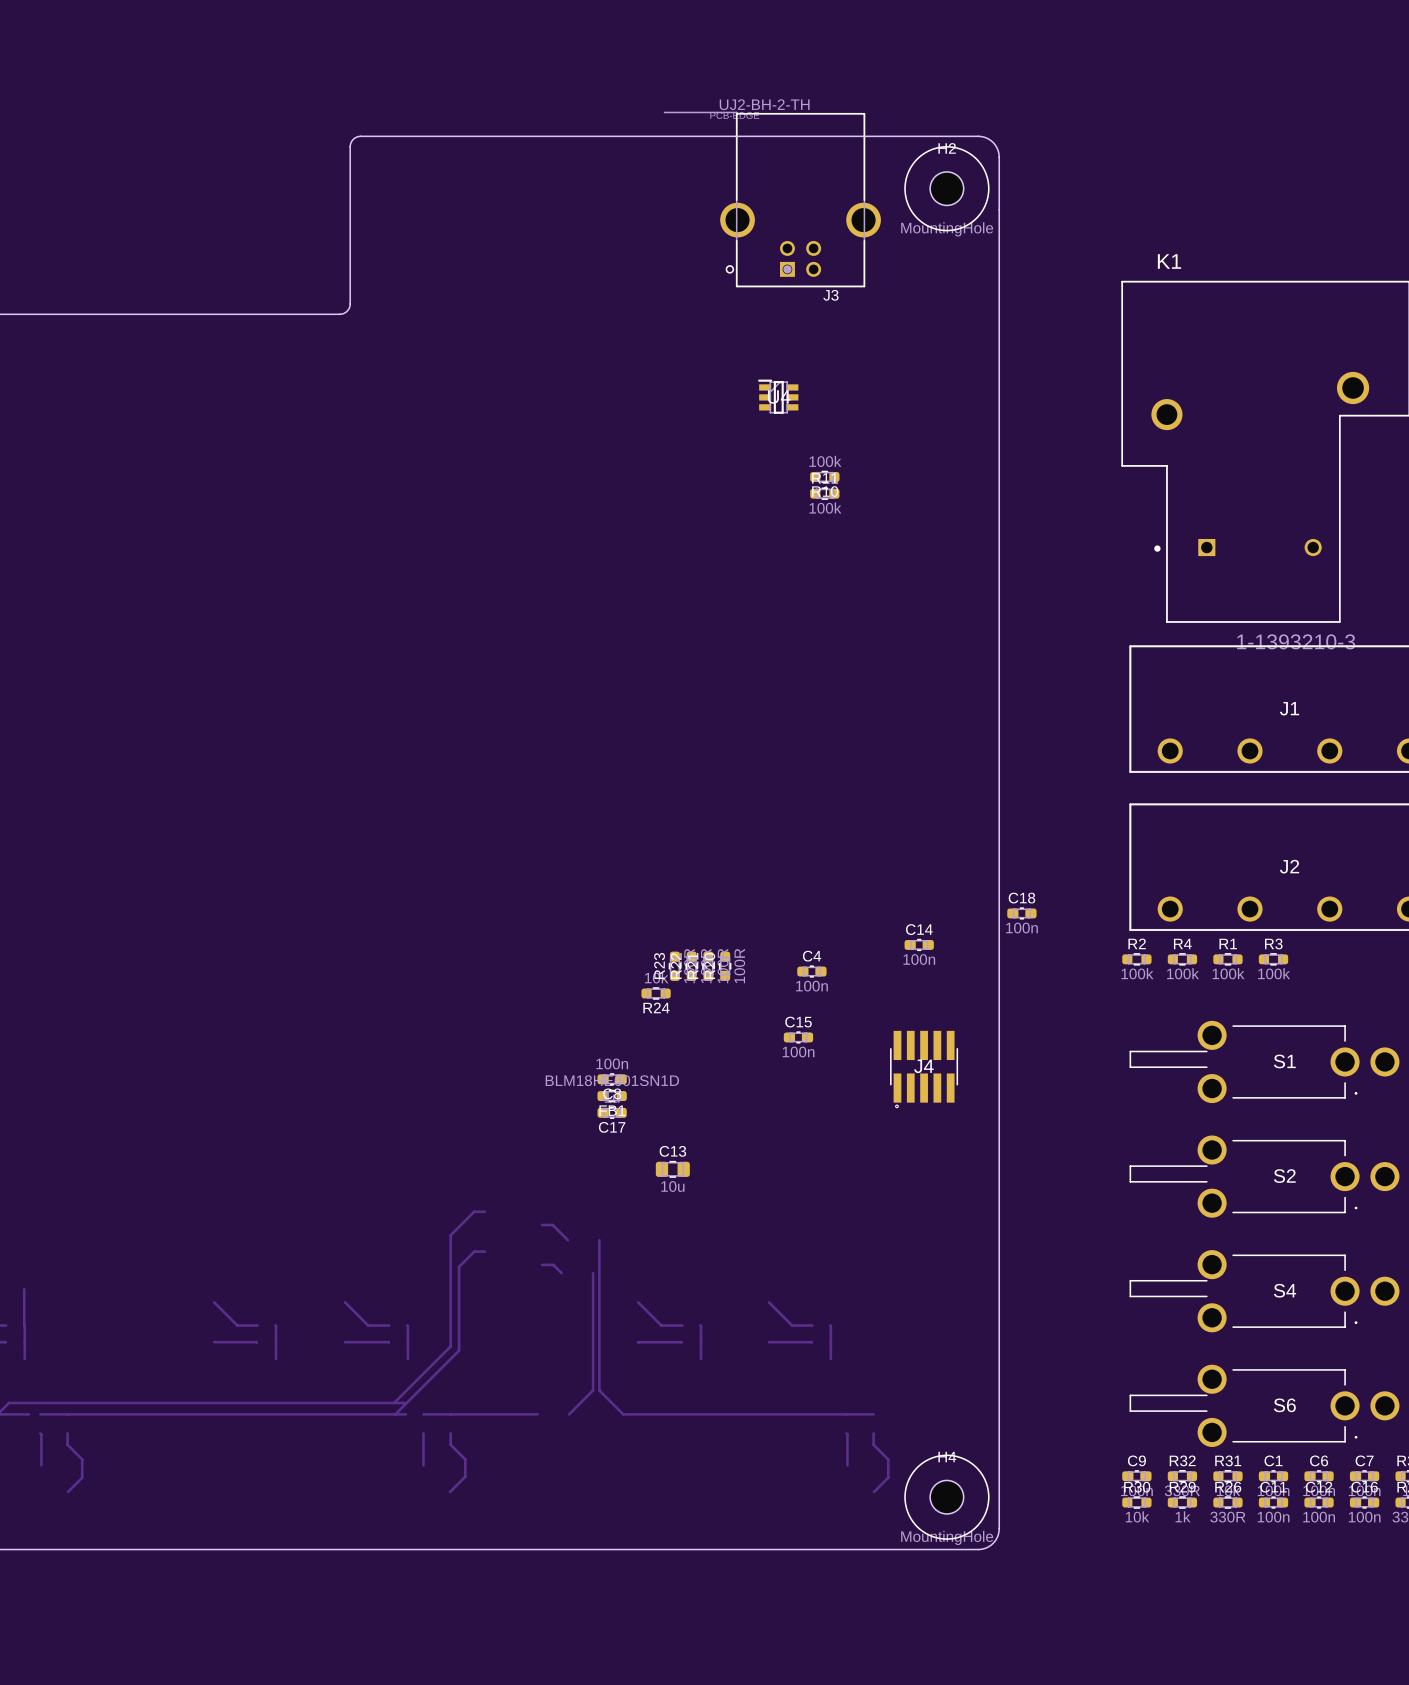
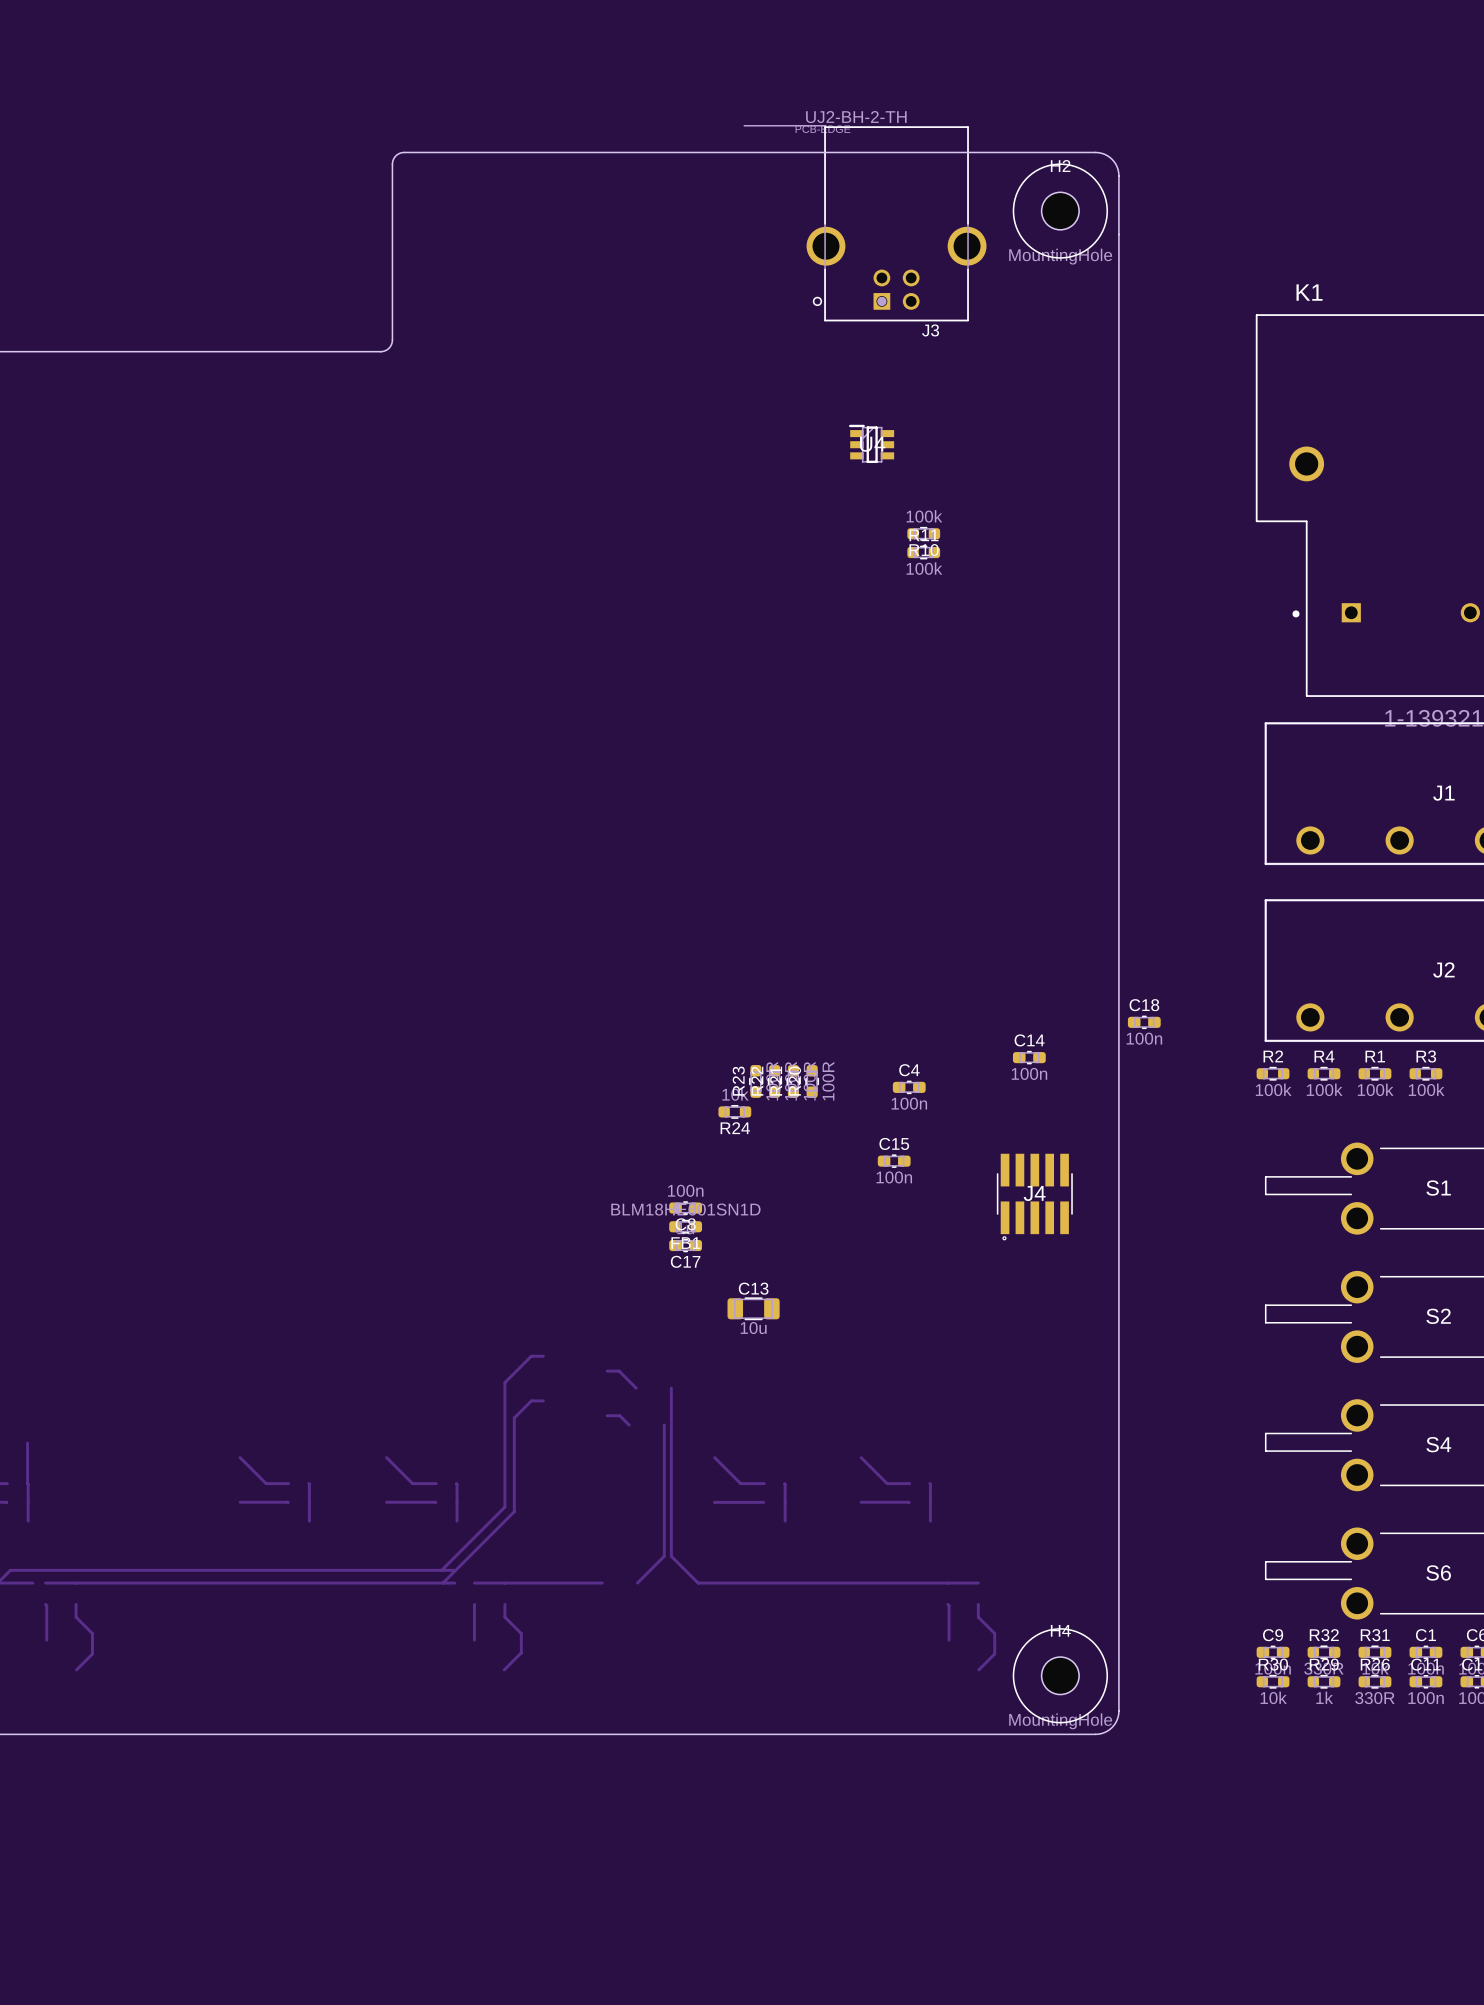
C13 footprint: [655, 1161, 690, 1178] -> [727, 1297, 780, 1321]

